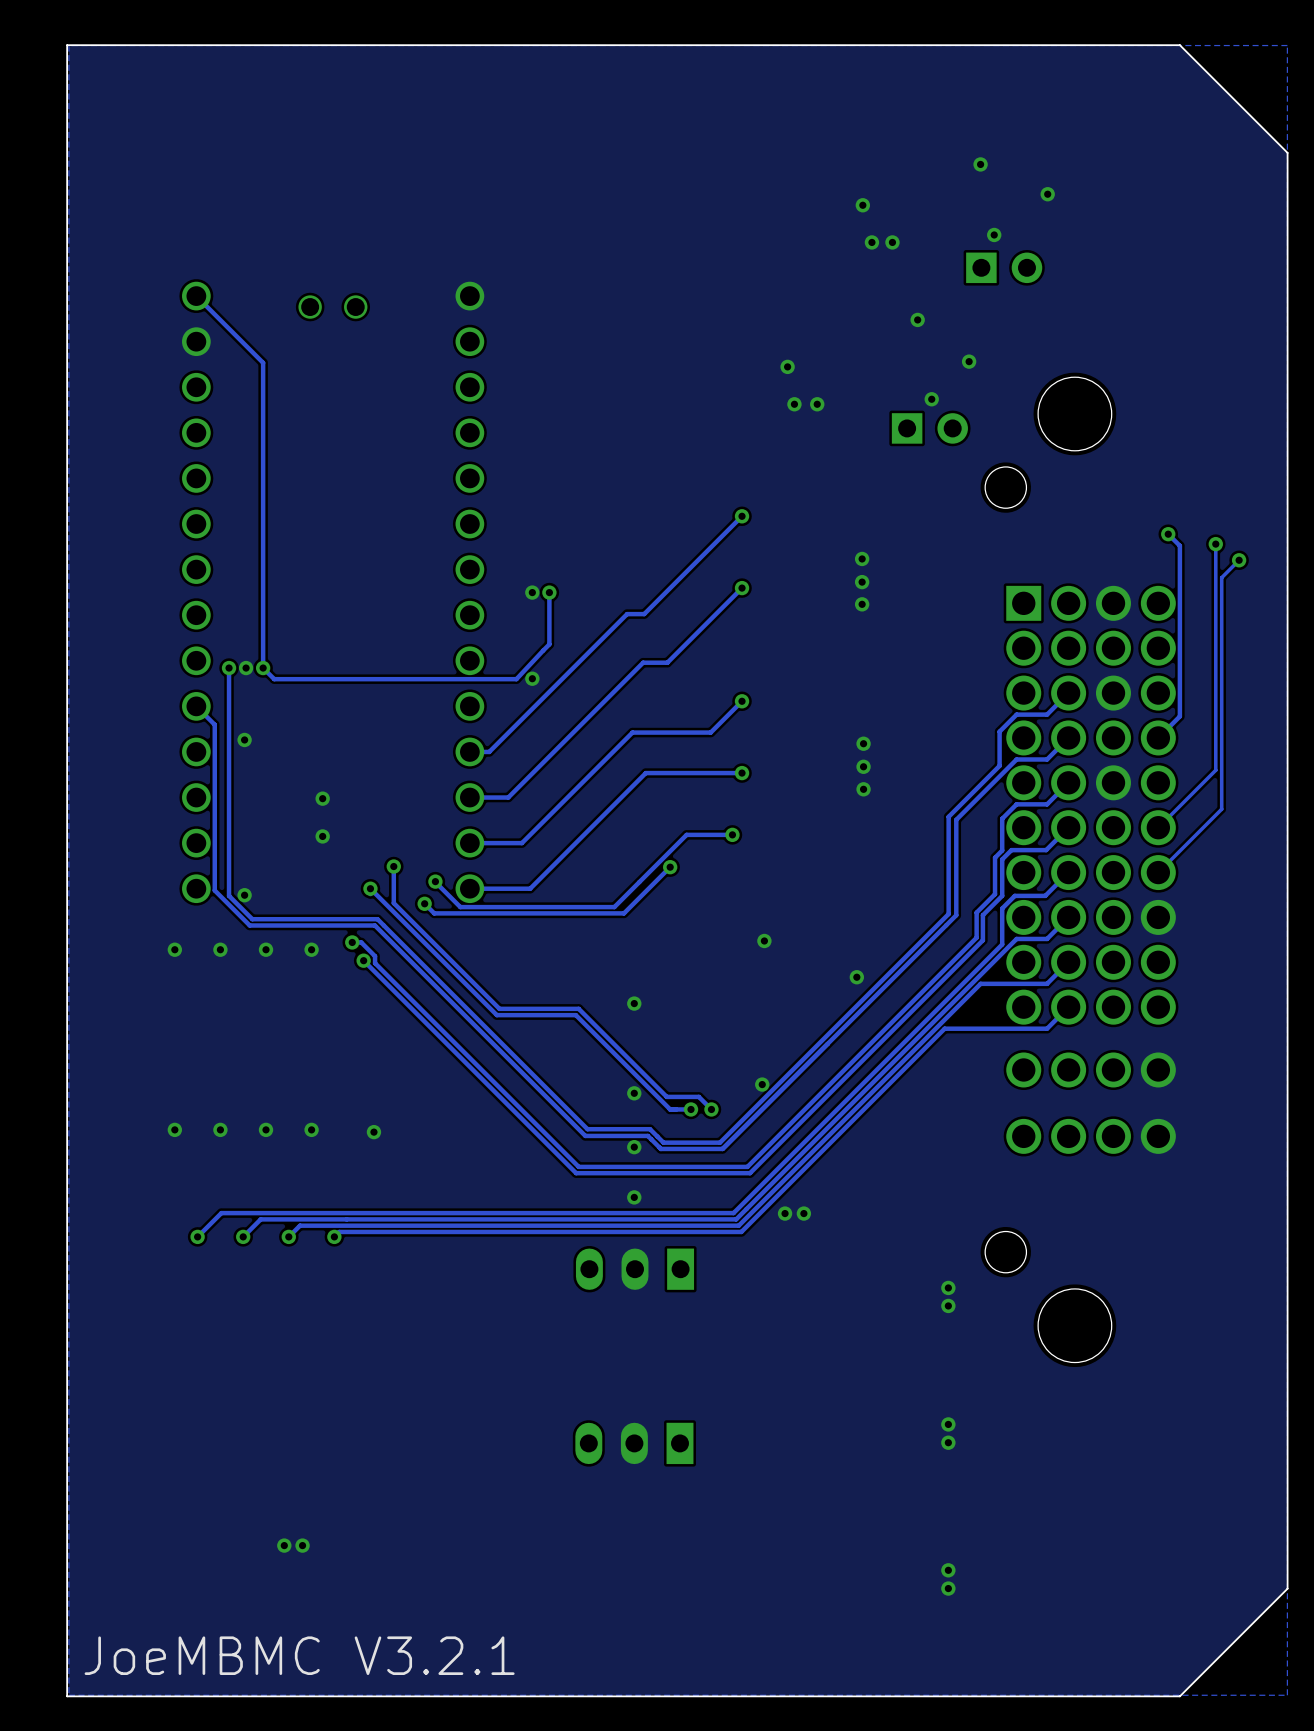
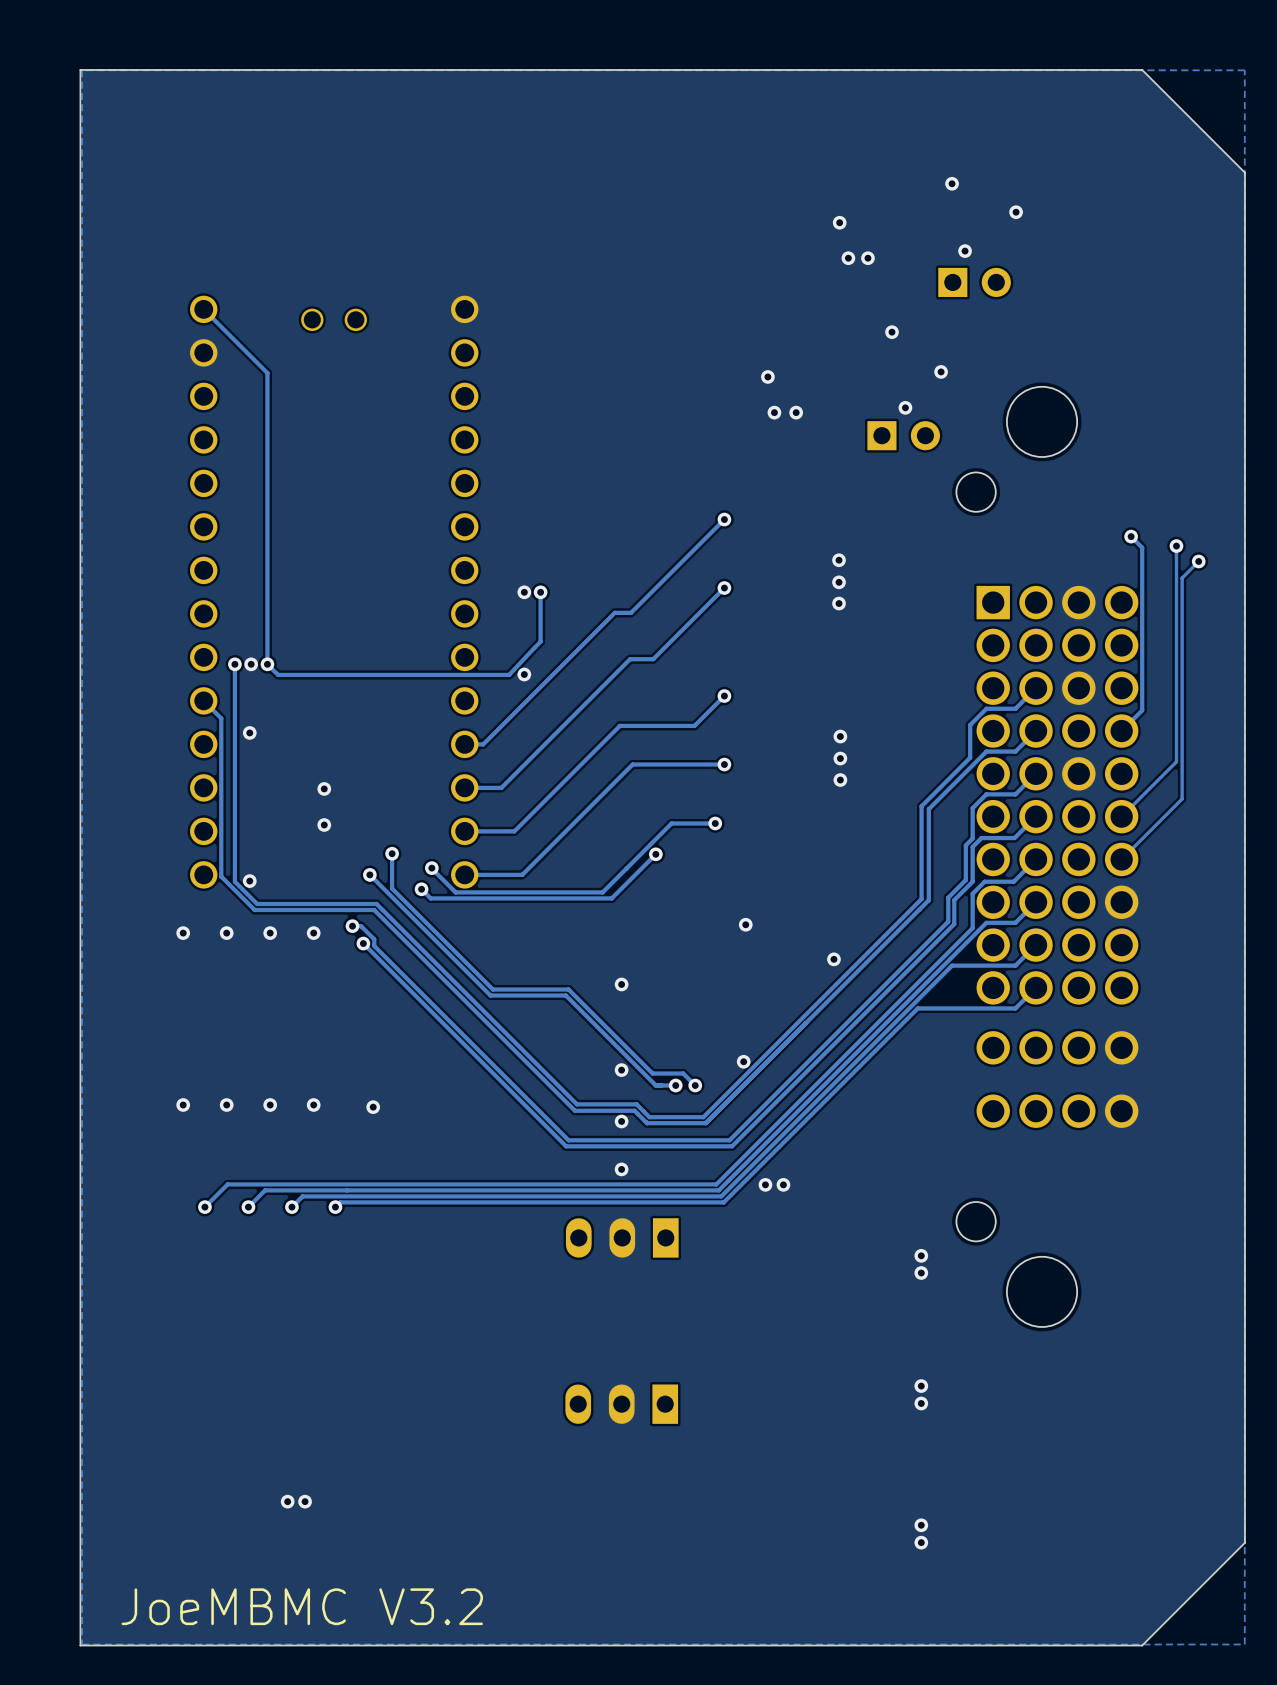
text: JoeMBMC V3.2.1 (299, 1655) -> JoeMBMC V3.2 (302, 1606)

